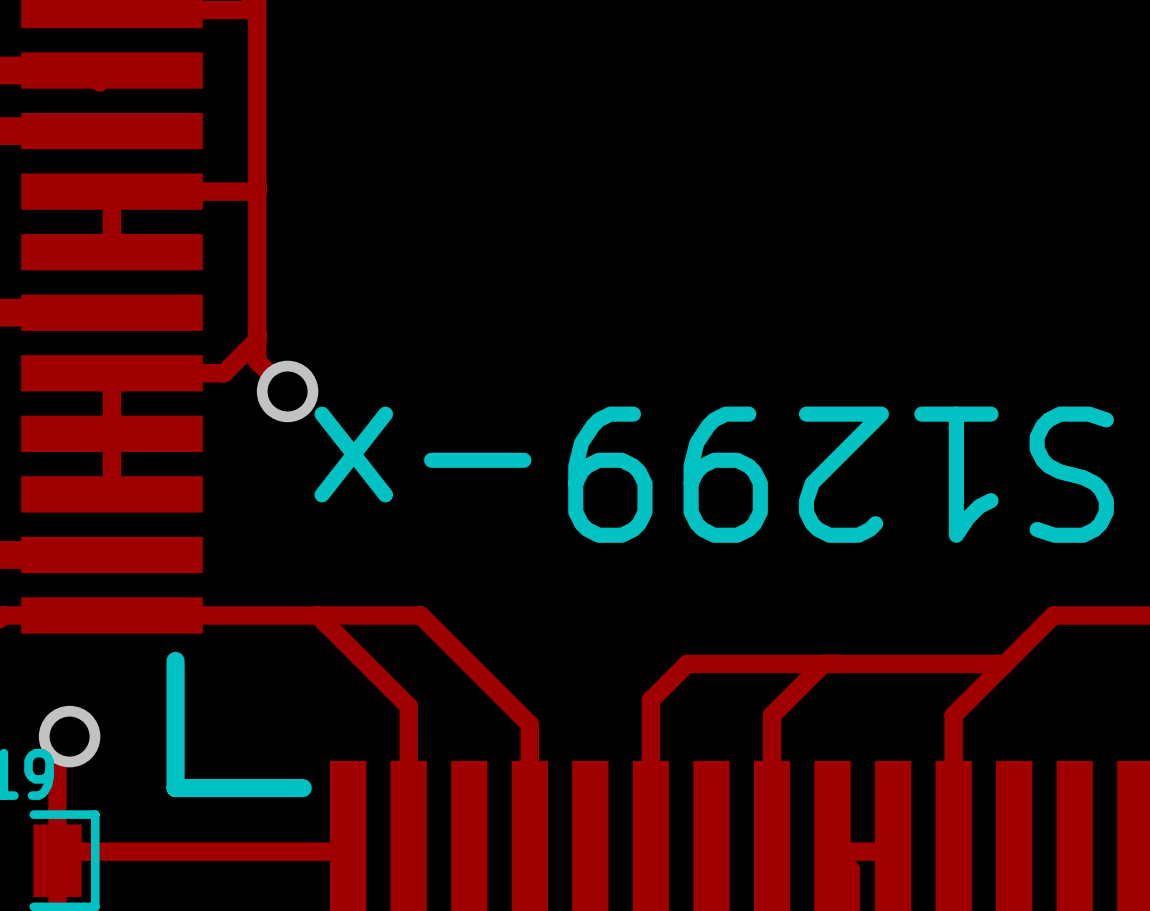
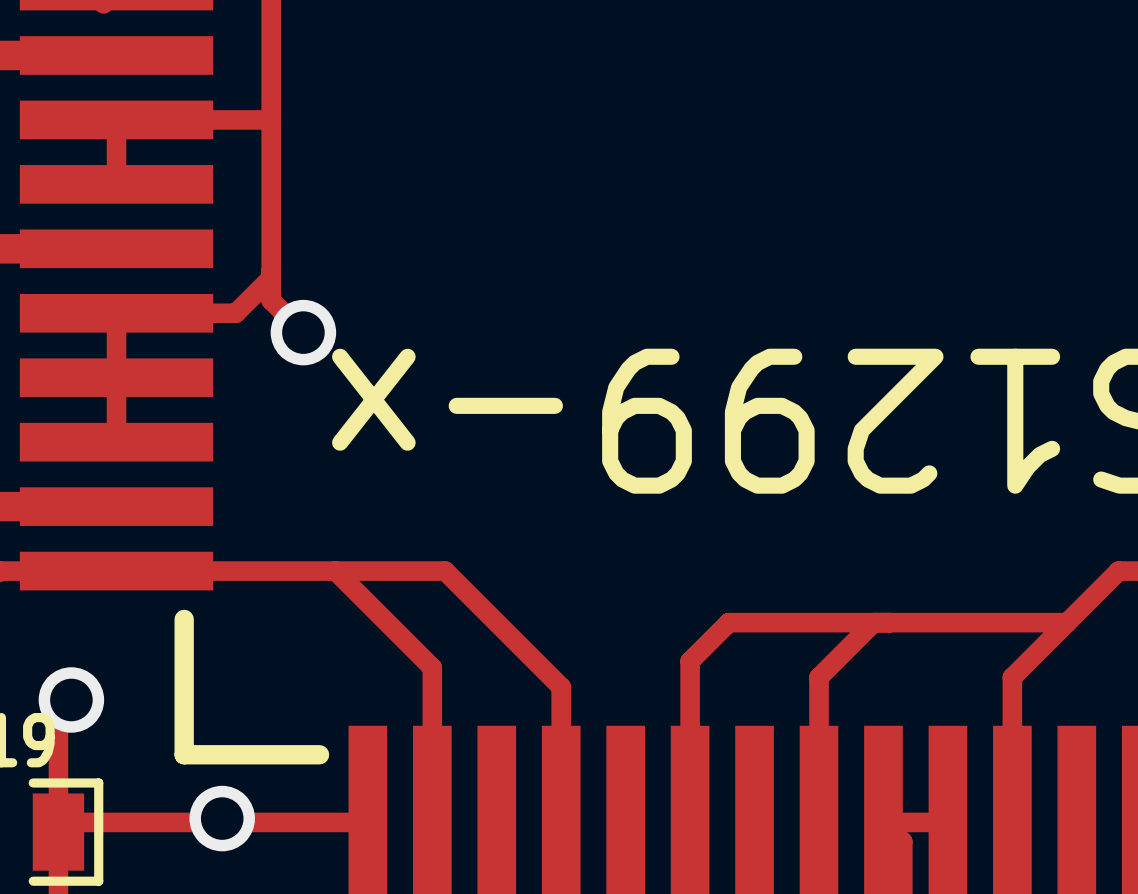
via: none -> (222, 818)

